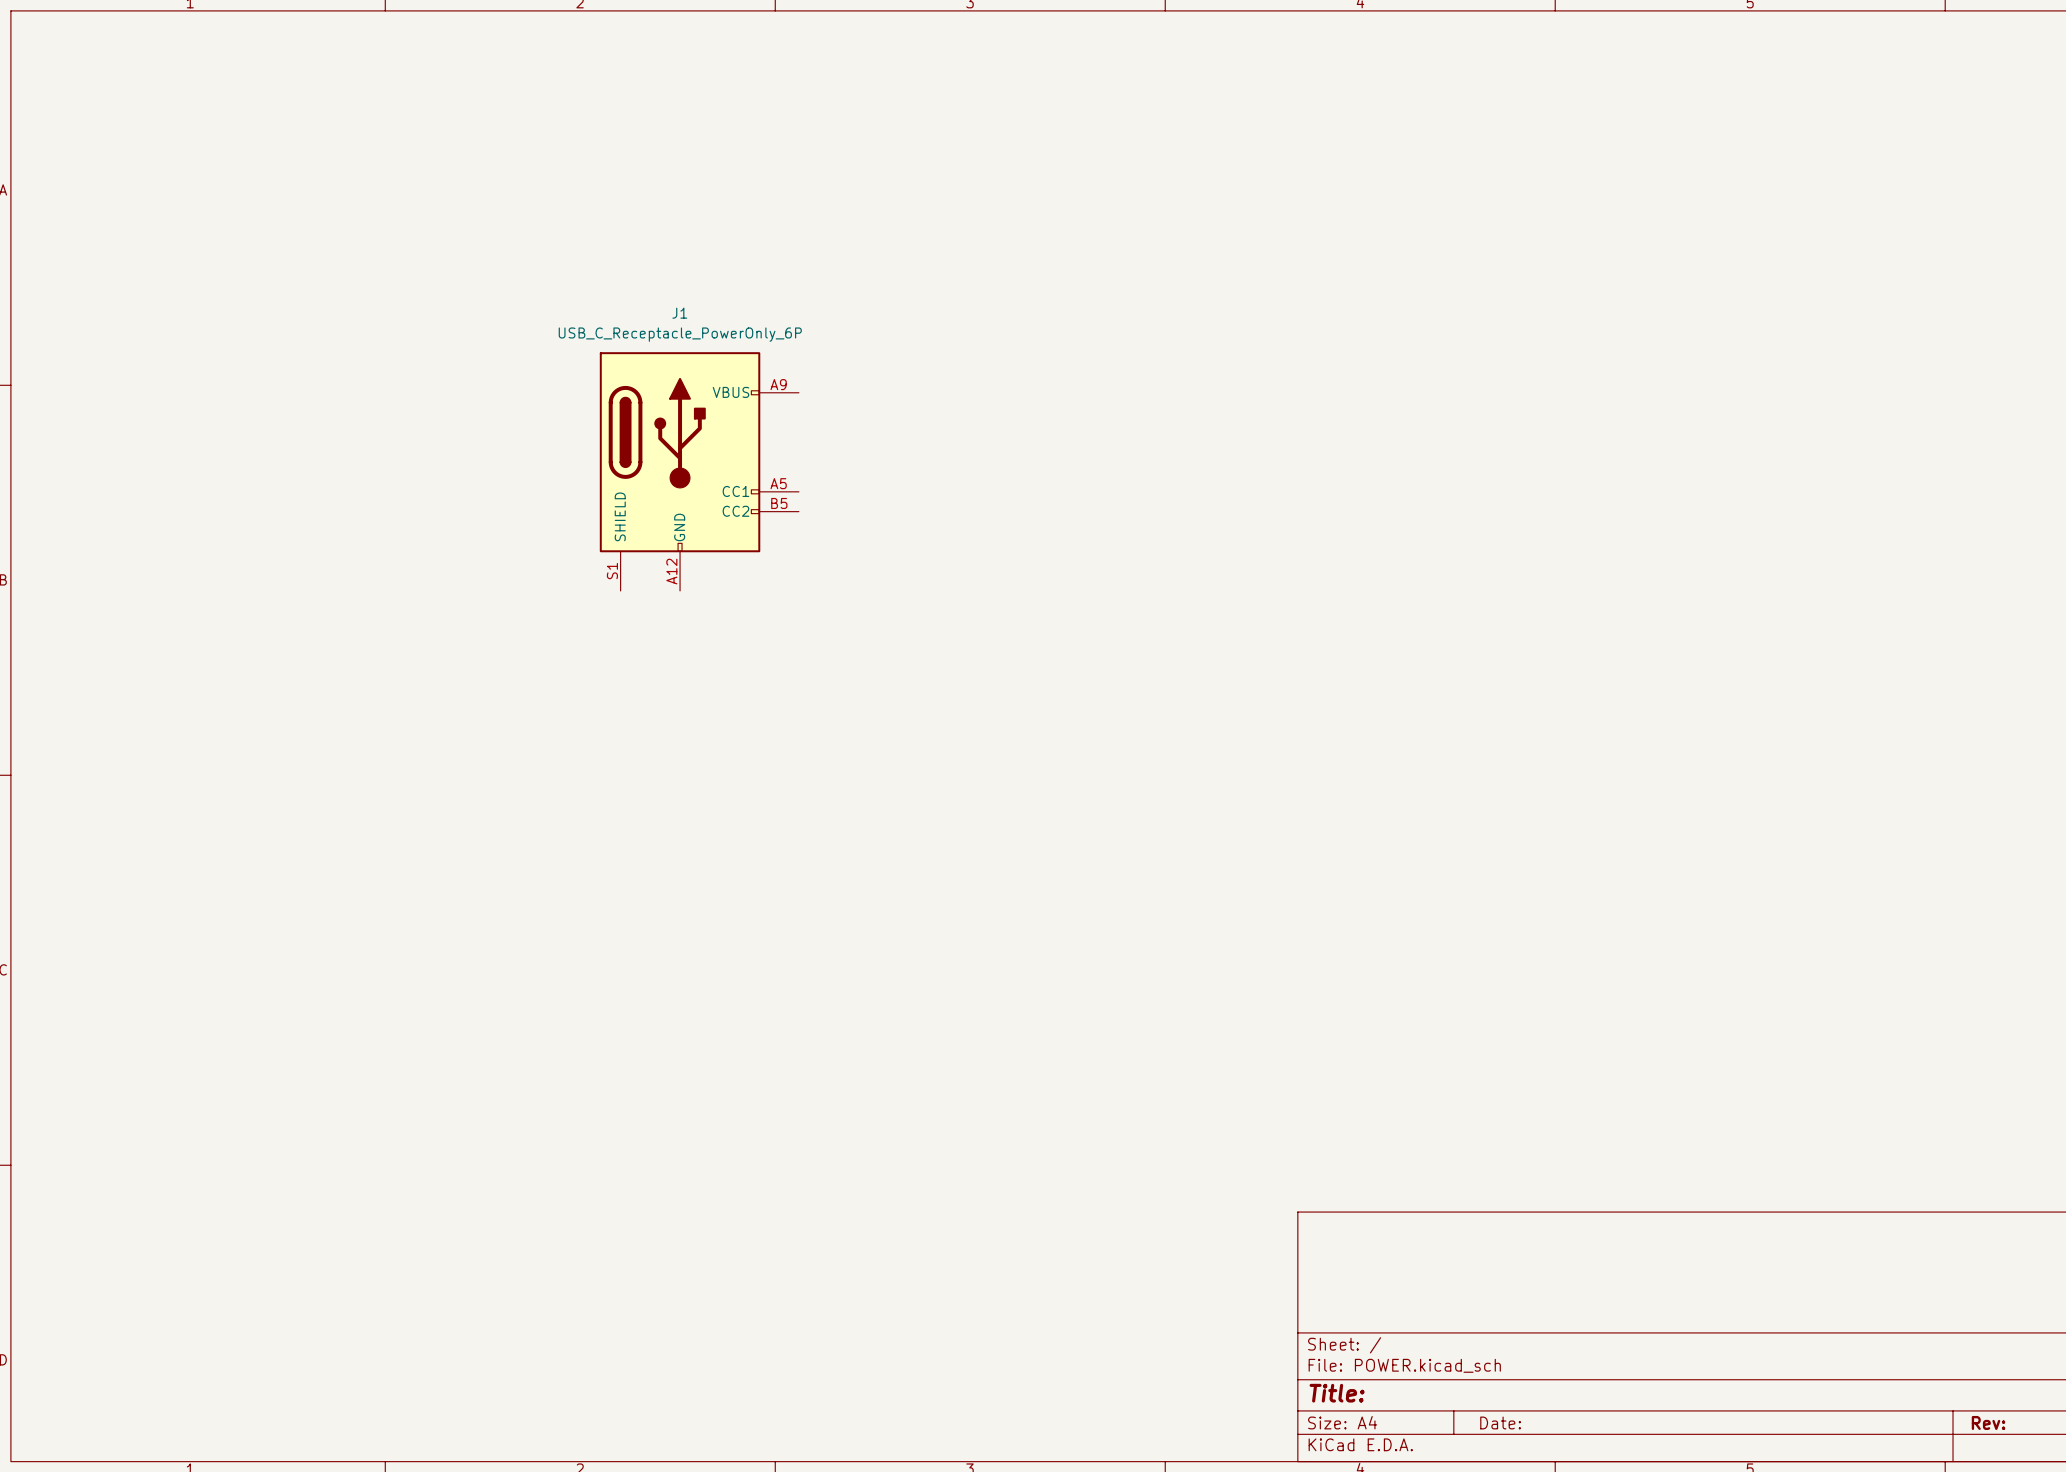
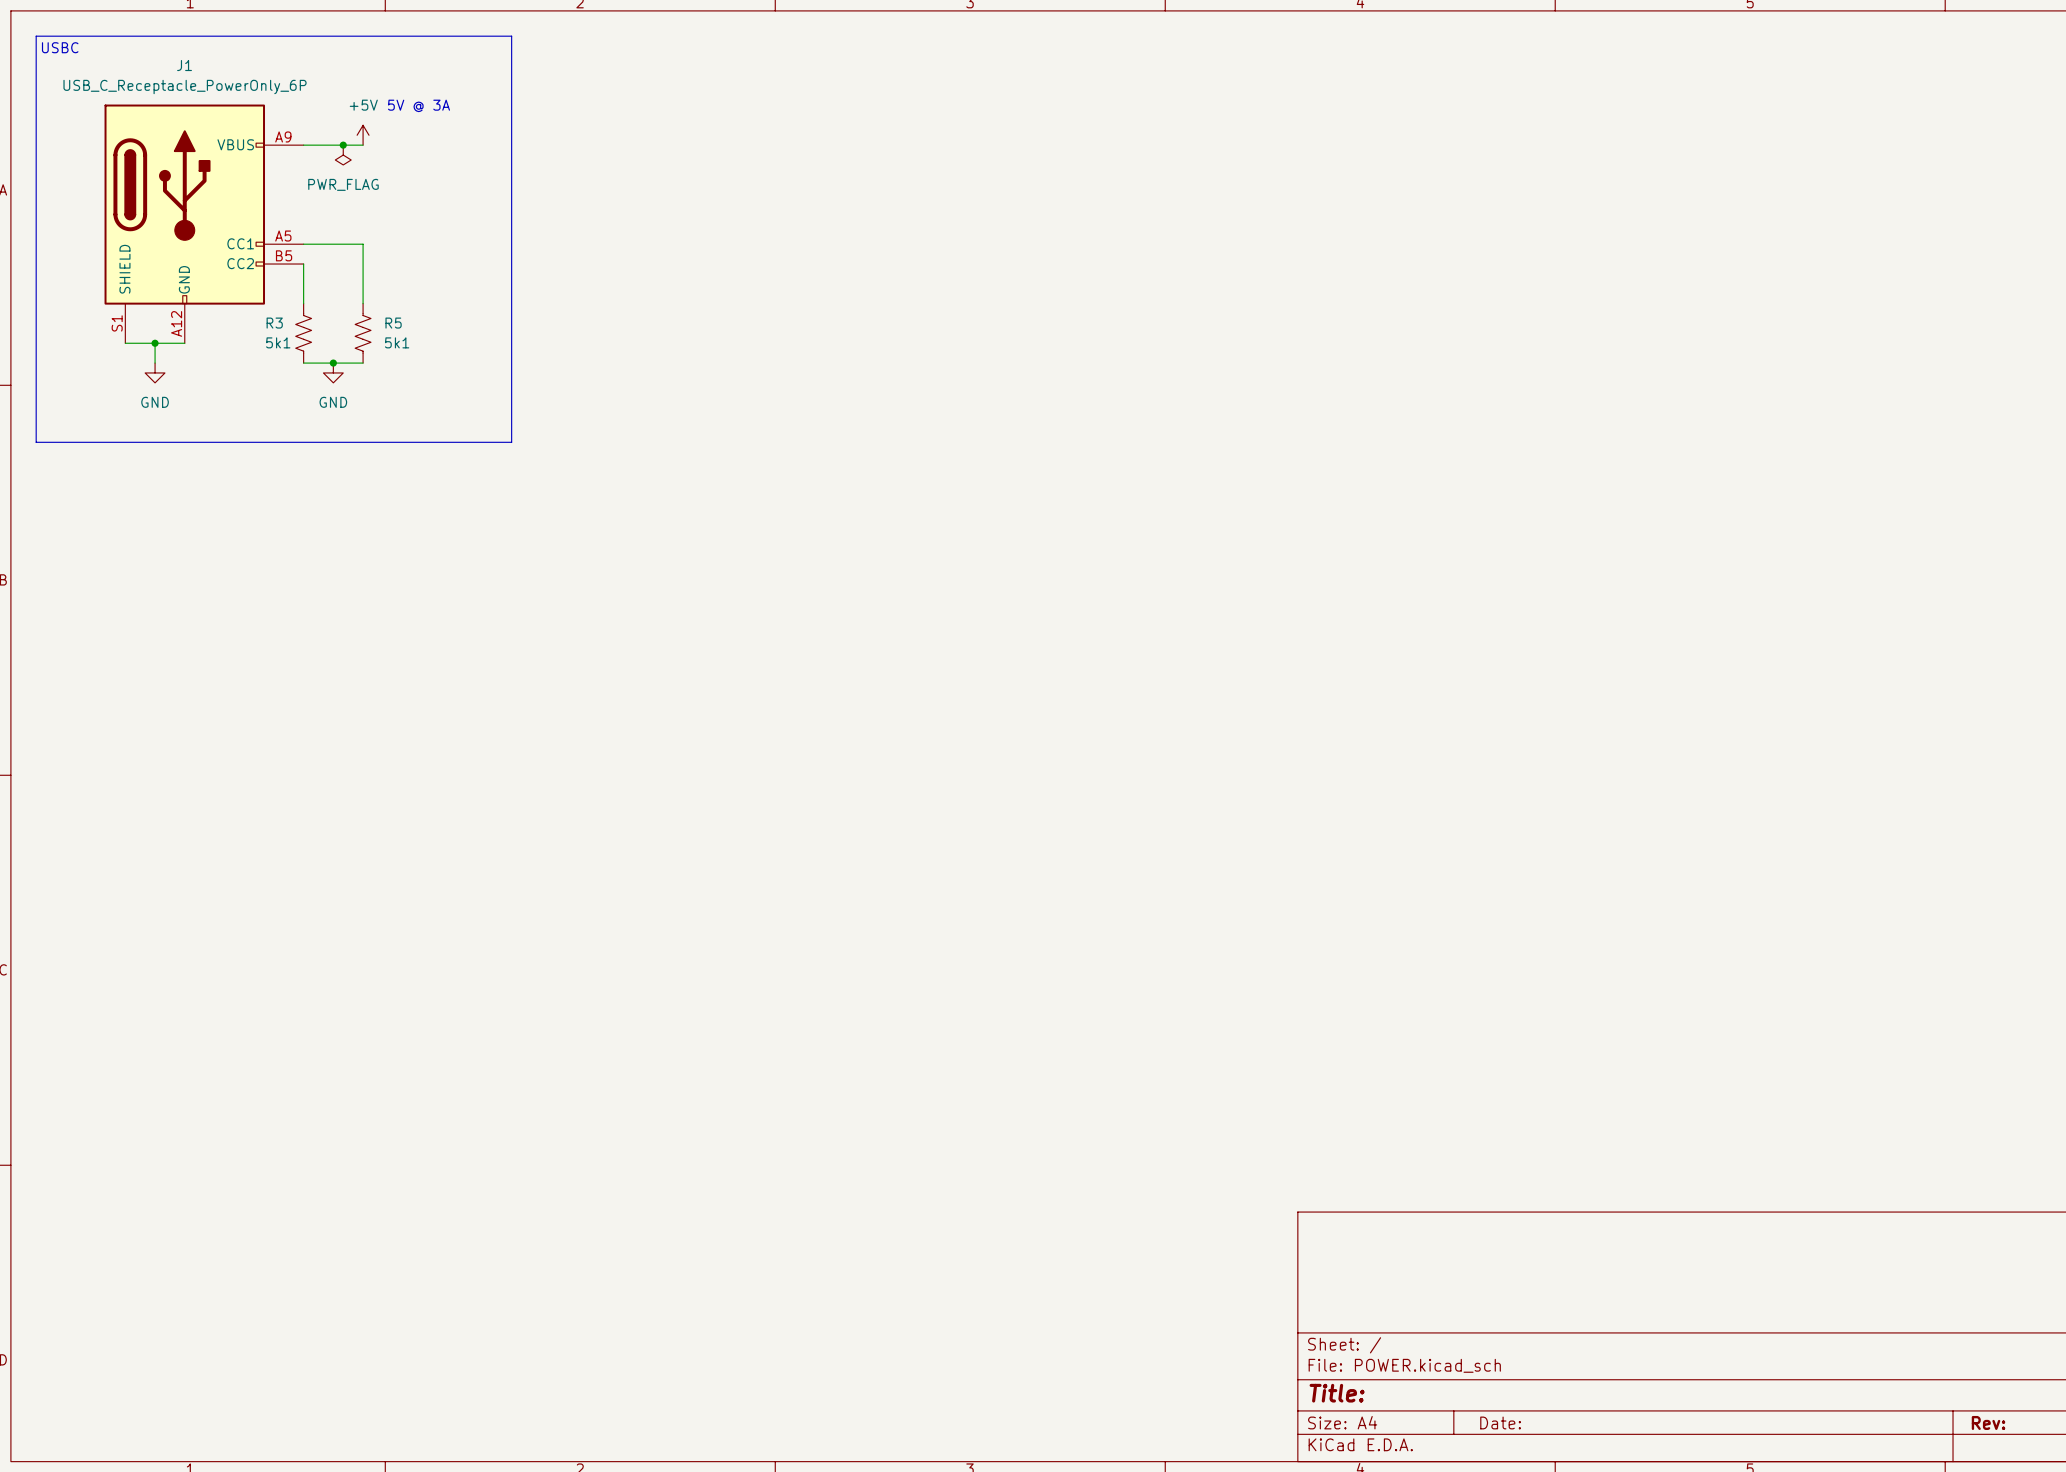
line: none -> (36, 36) (511, 36) (511, 442) (36, 442) (36, 36)
text: none -> USBC (60, 47)
text: none -> 5V @ 3A (419, 105)
power symbol: none -> +5V (363, 135)
wire: none -> (303, 145) (363, 145)
junction: none -> (343, 145)
power symbol: none -> PWR_FLAG (343, 155)
wire: none -> (303, 244) (363, 244) (363, 303)
wire: none -> (303, 264) (303, 303)
R3: none -> 5k1 (303, 333)
R5: none -> 5k1 (363, 333)
wire: none -> (125, 343) (184, 343)
wire: none -> (155, 343) (155, 363)
junction: none -> (155, 343)
wire: none -> (303, 363) (363, 363)
junction: none -> (333, 363)
power symbol: none -> GND (155, 372)
power symbol: none -> GND (333, 372)
J1 position: (699, 471) -> (204, 223)

